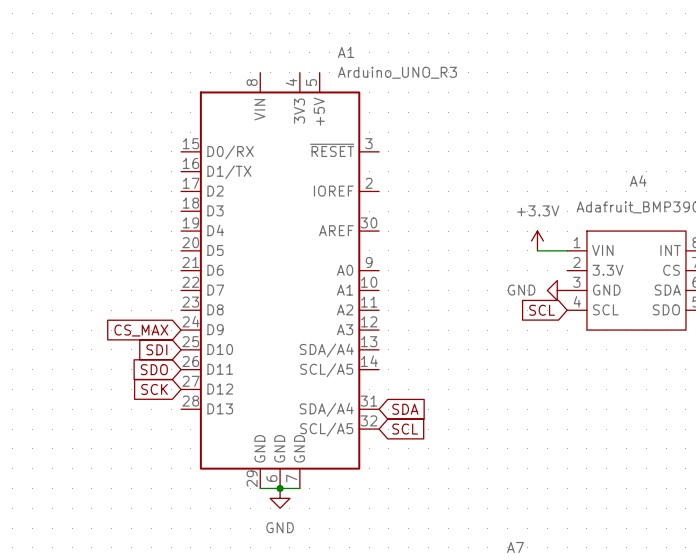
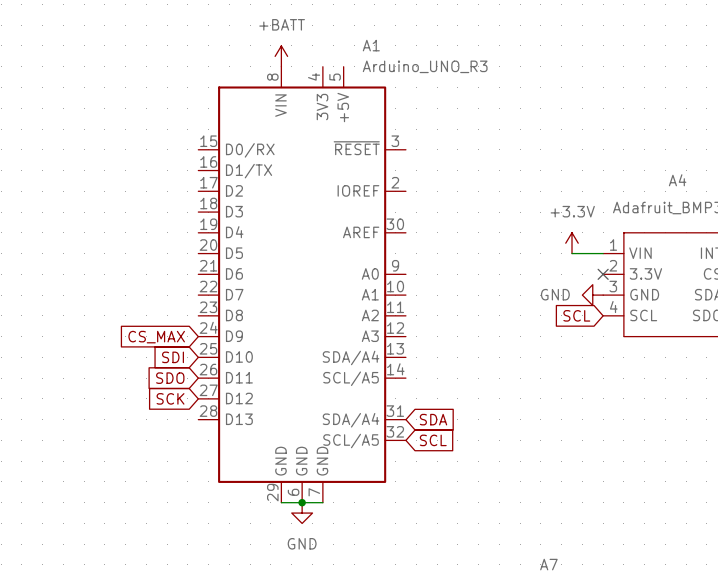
power symbol: none -> +BATT (281, 56)
no-connect mark: none -> (603, 274)

